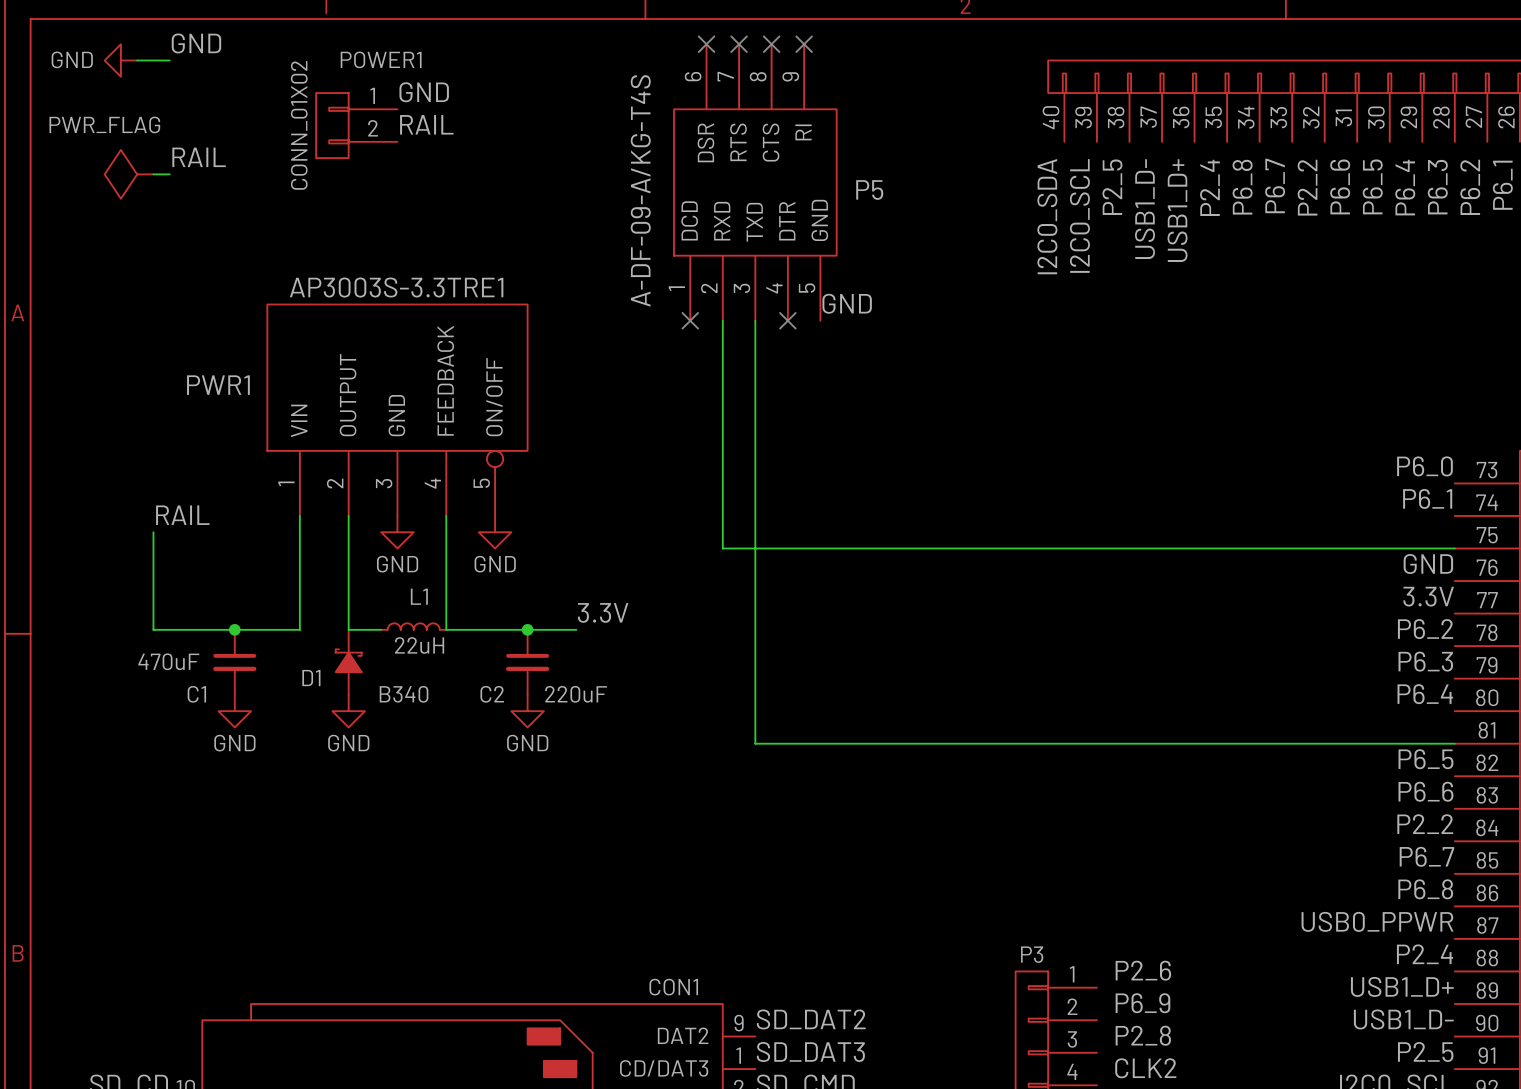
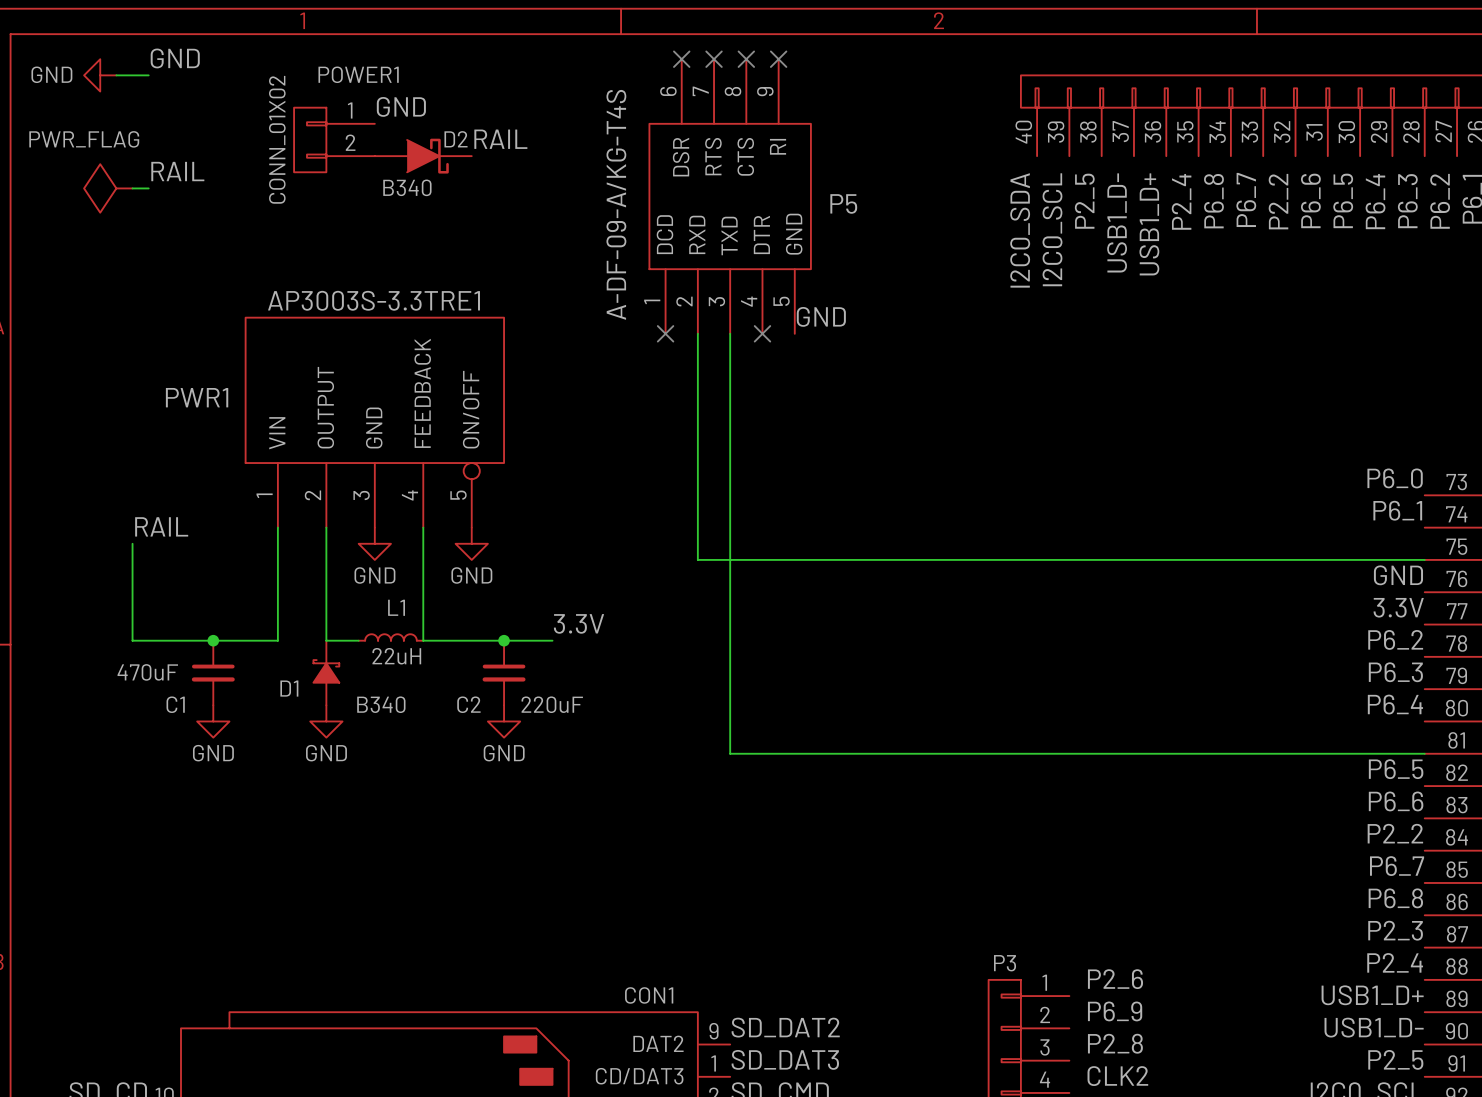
label position: RAIL (426, 124) -> RAIL (500, 139)
D2: none -> B340 (423, 156)
label: USB0_PPWR (1377, 921) -> P2_3 (1395, 930)

